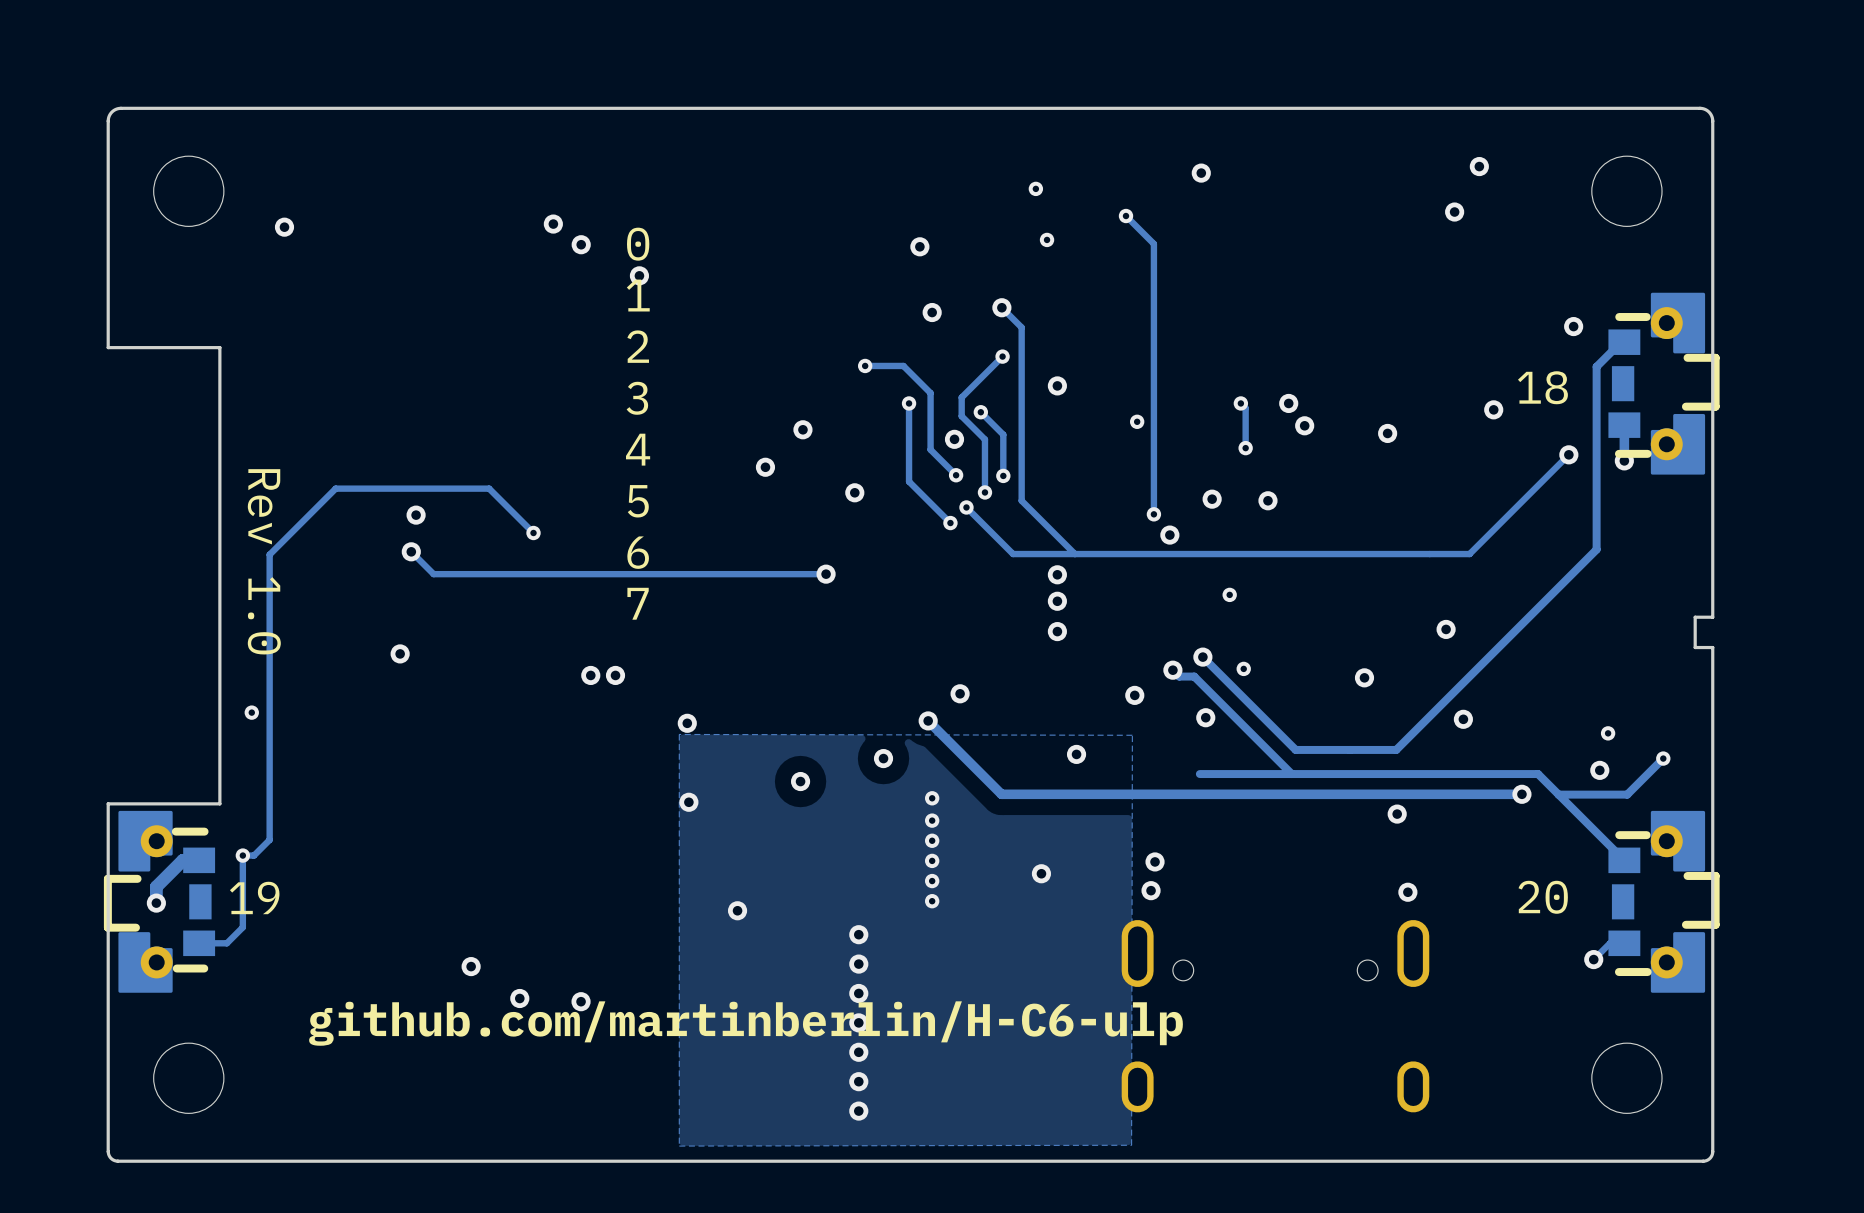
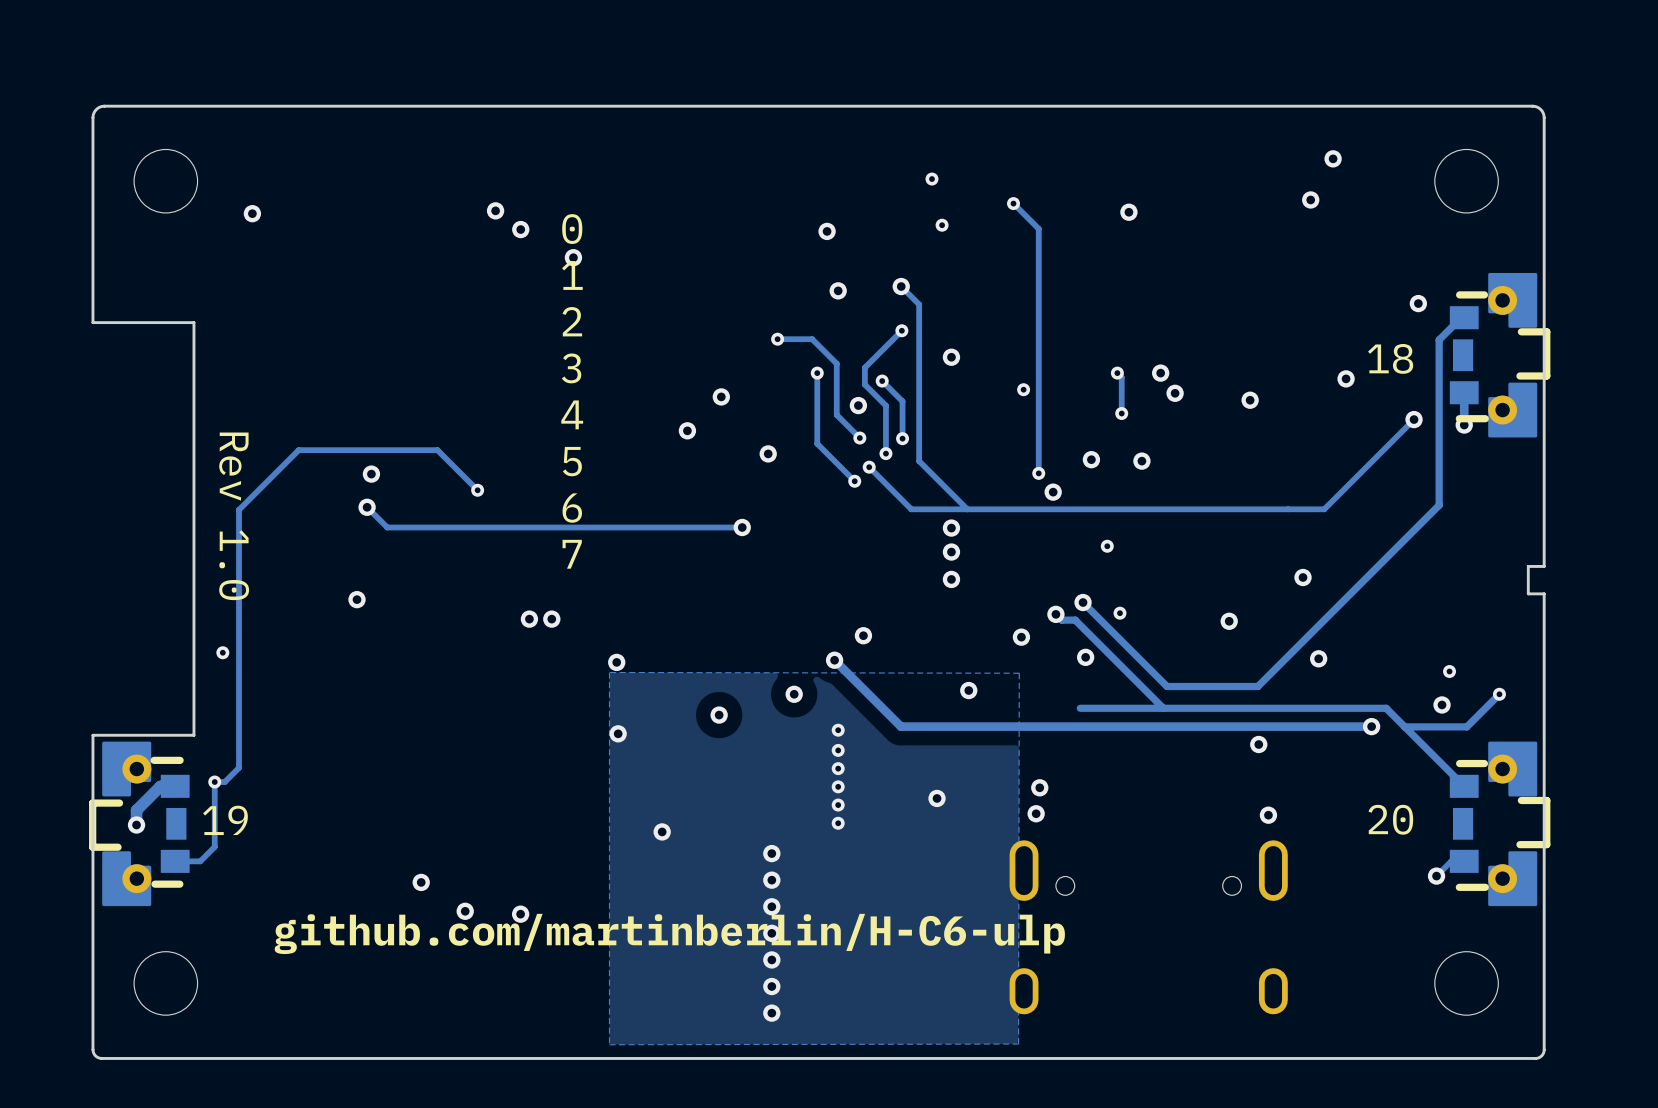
via position: (1201, 173) -> (1128, 212)

